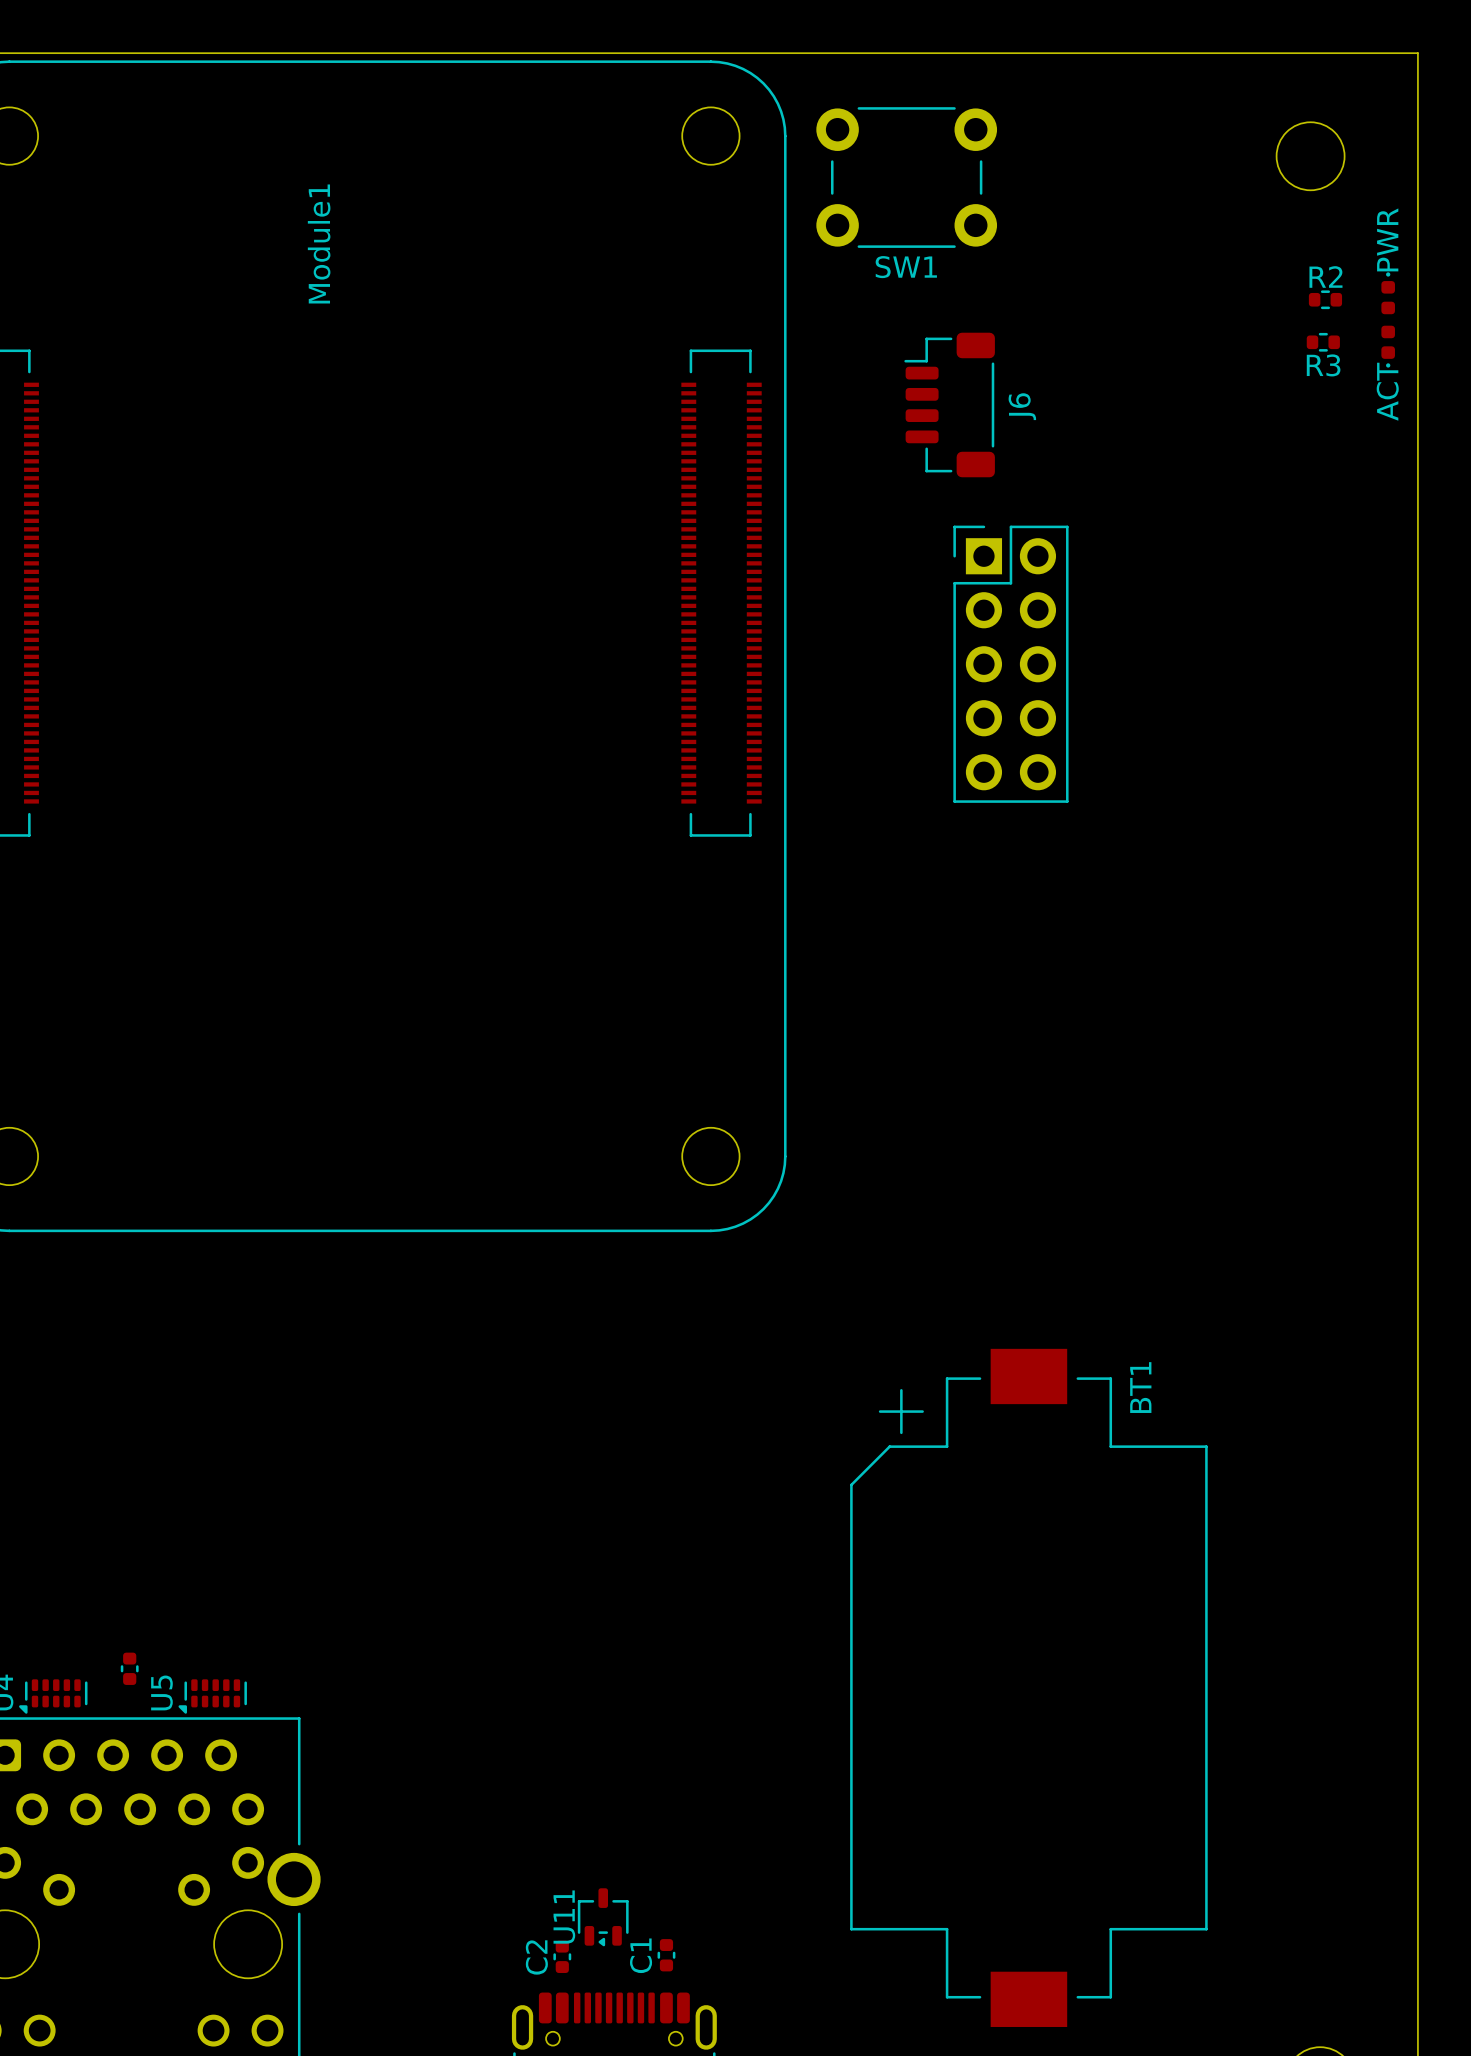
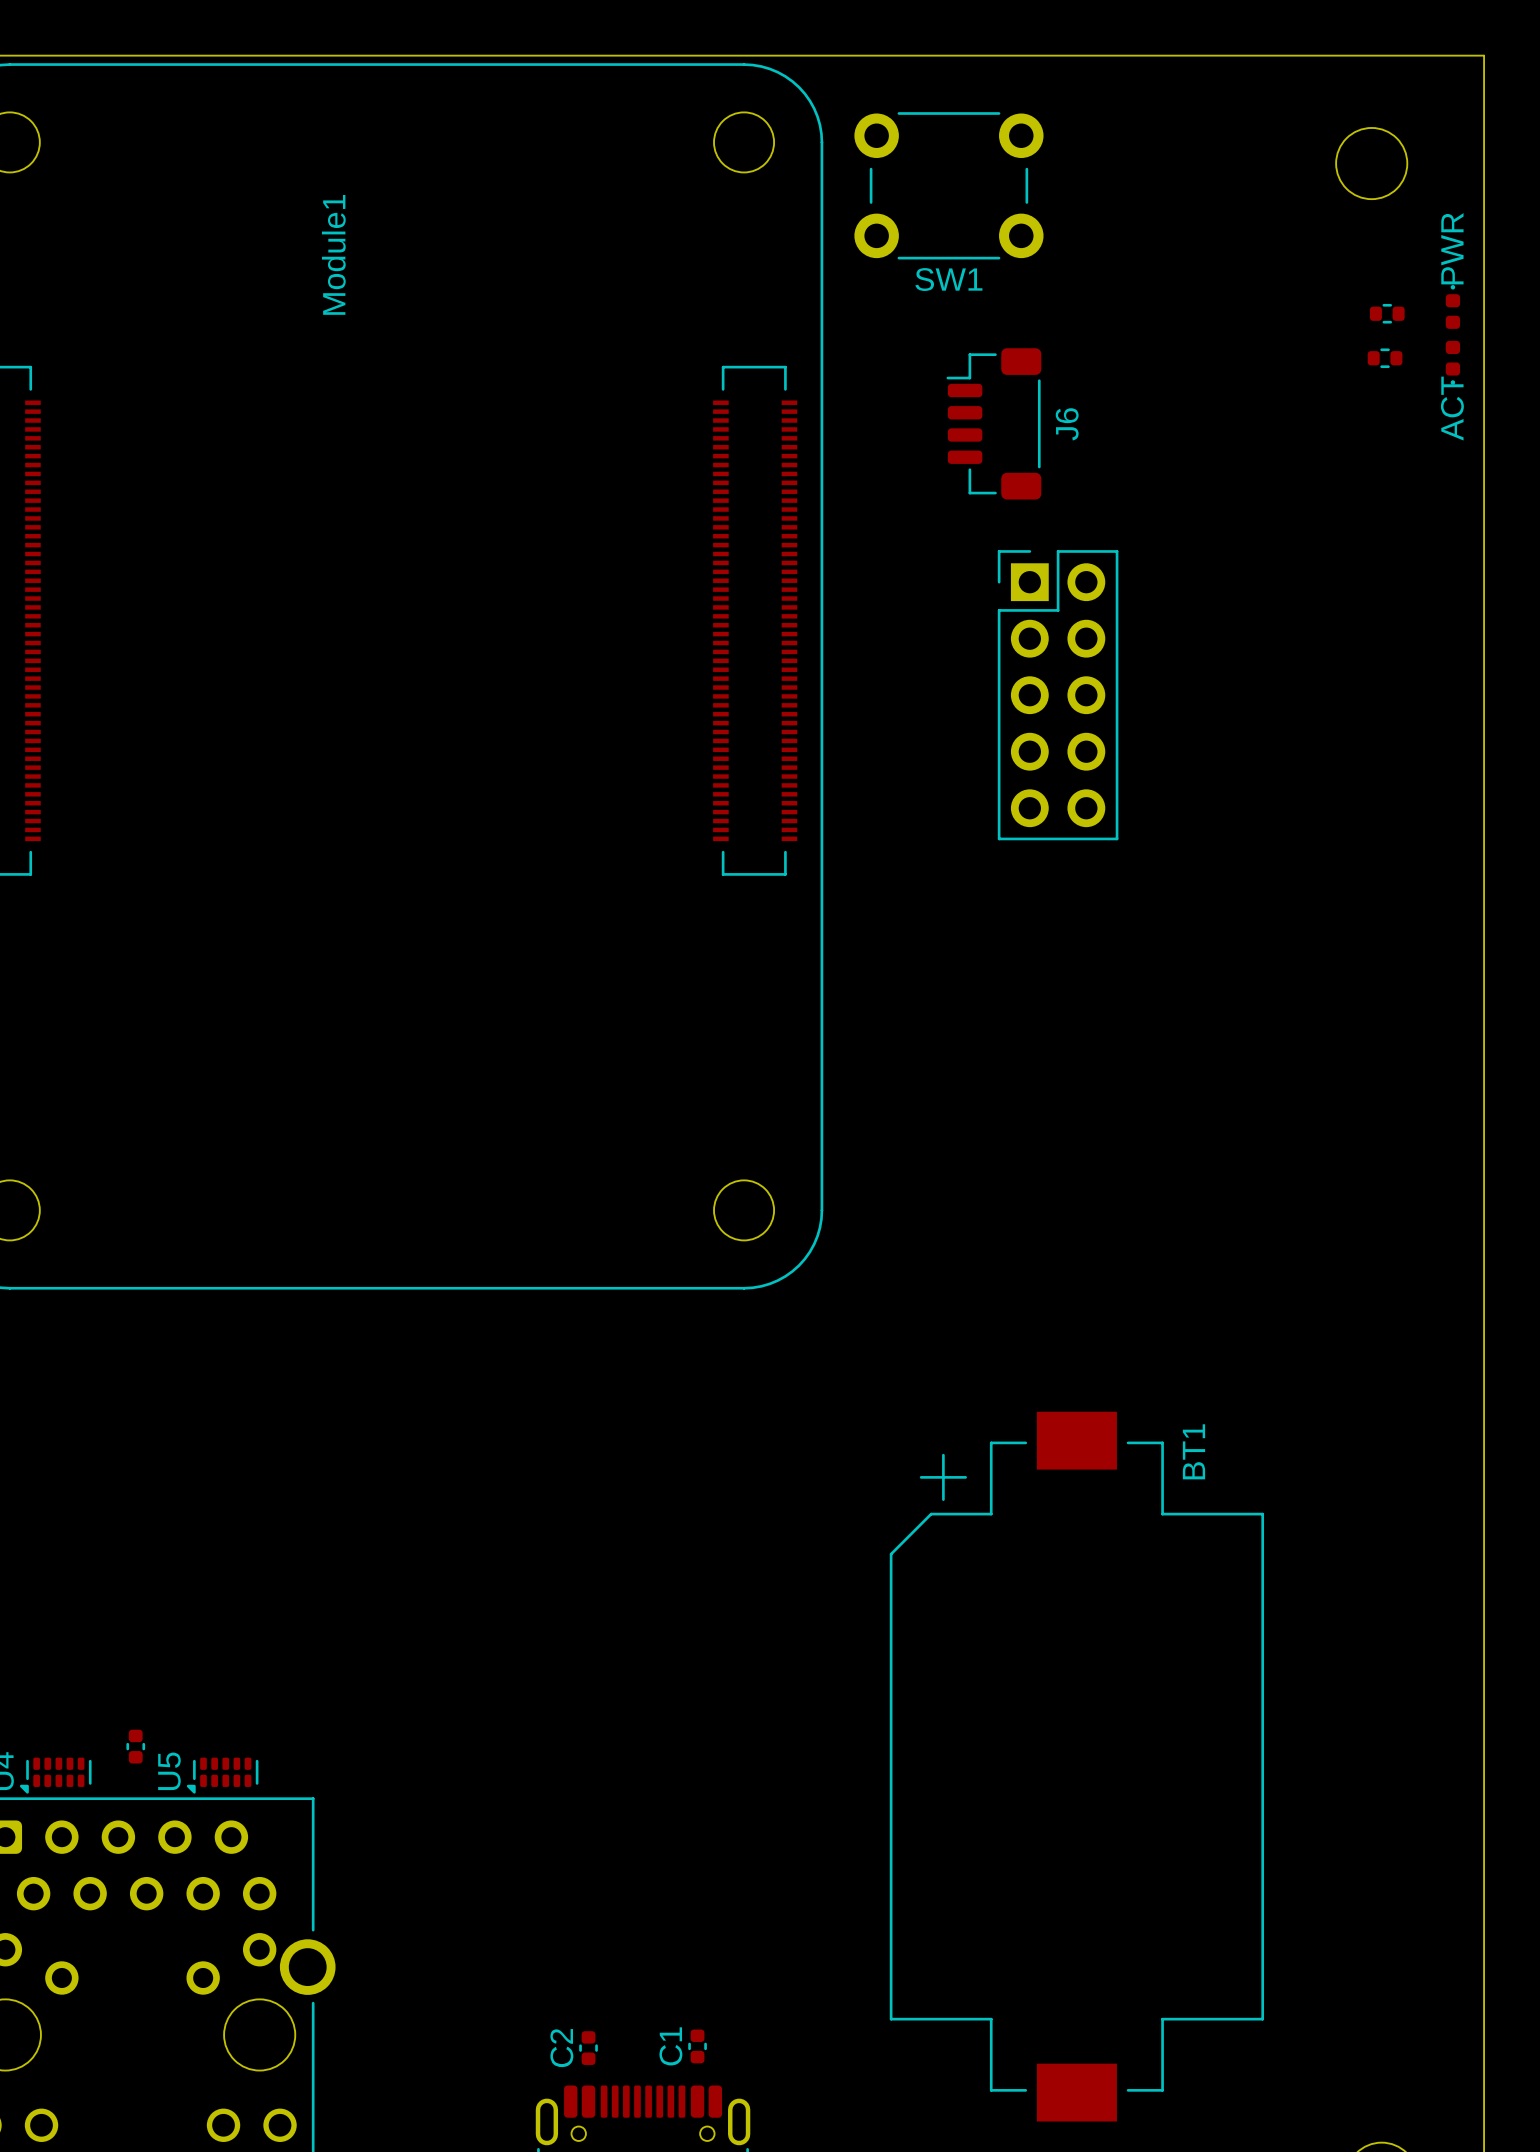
R2 name: R2 (1325, 276) -> none
R3 name: R3 (1323, 365) -> none
U11: (603, 1917) -> none

